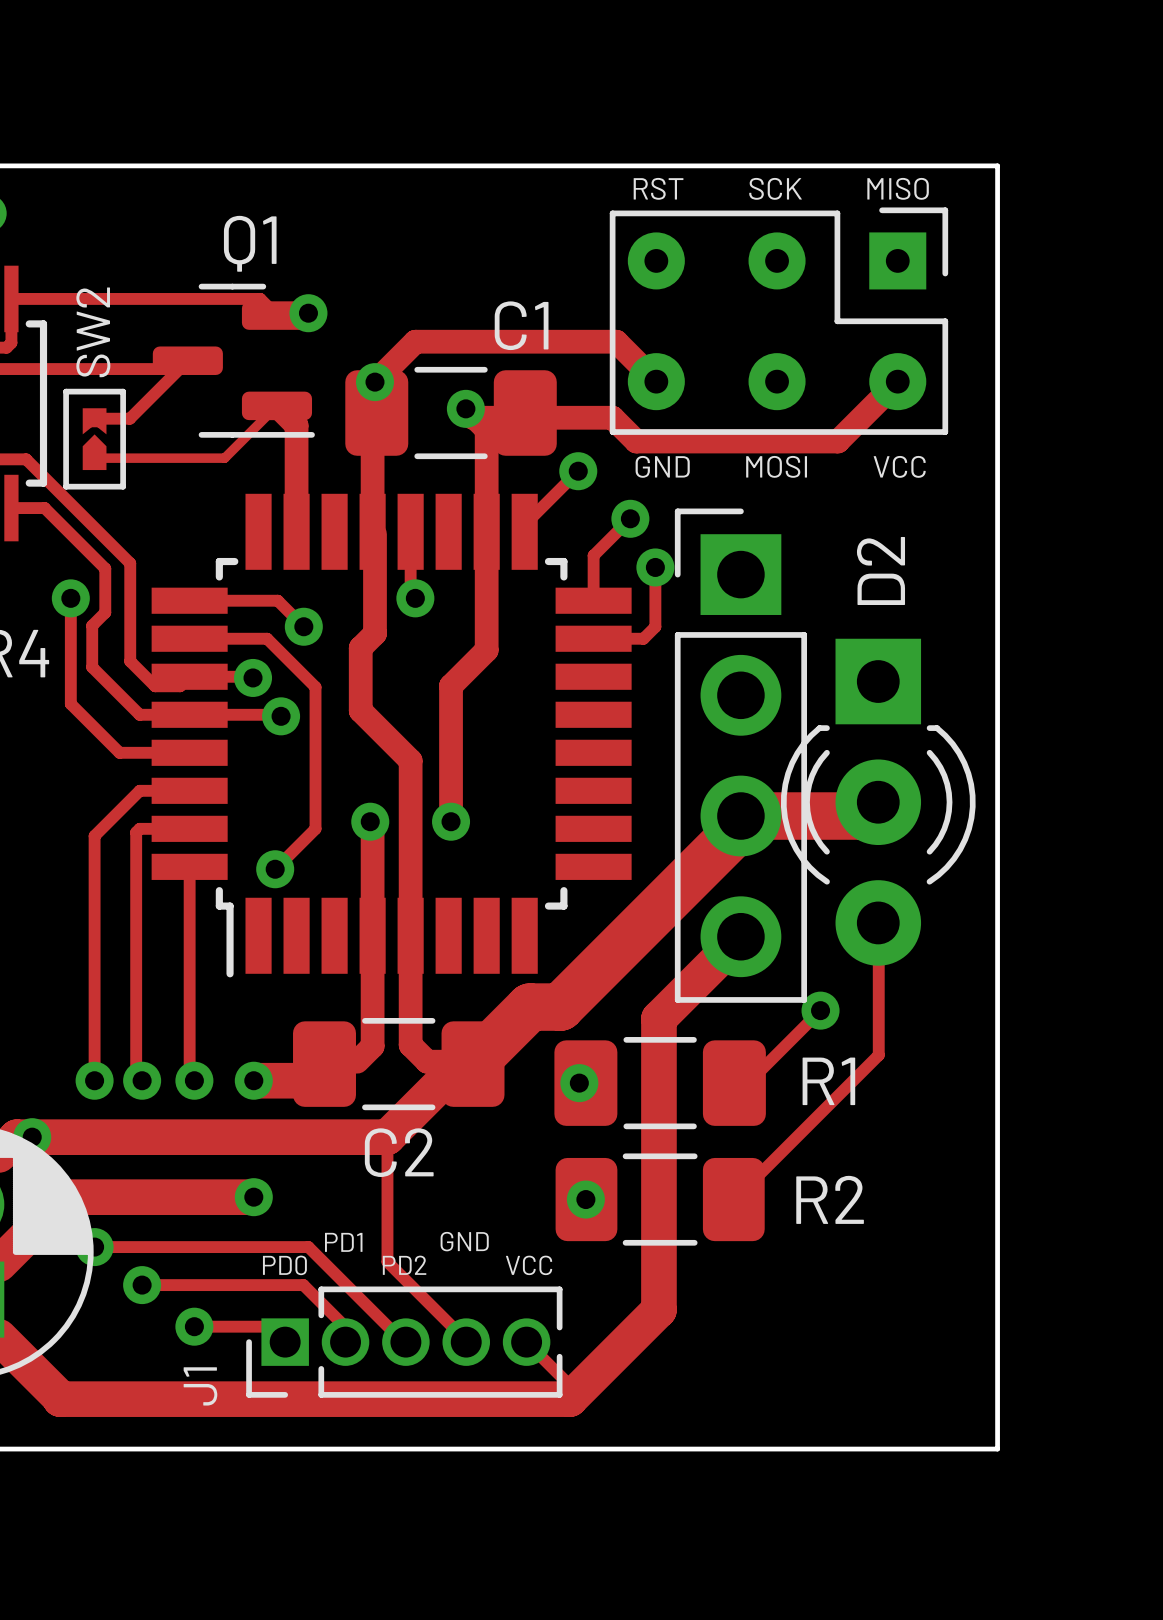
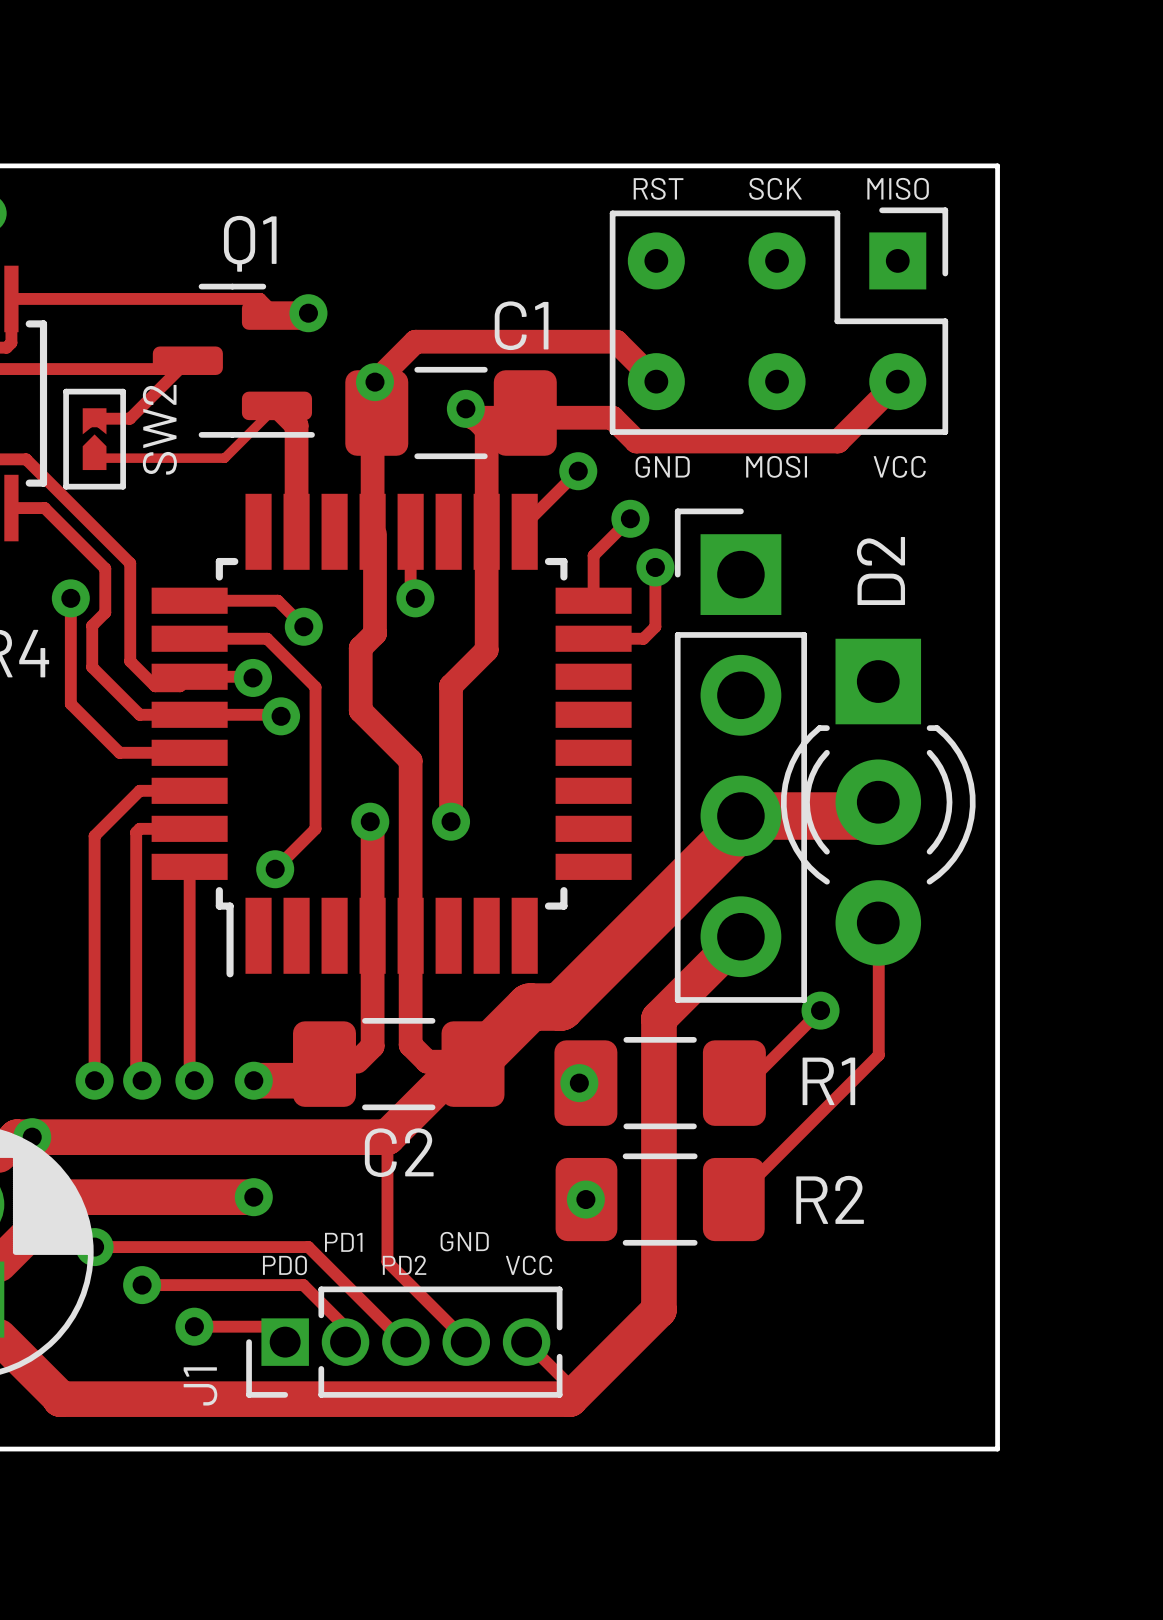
SW2 name position: SW2 (93, 332) -> SW2 (159, 429)

